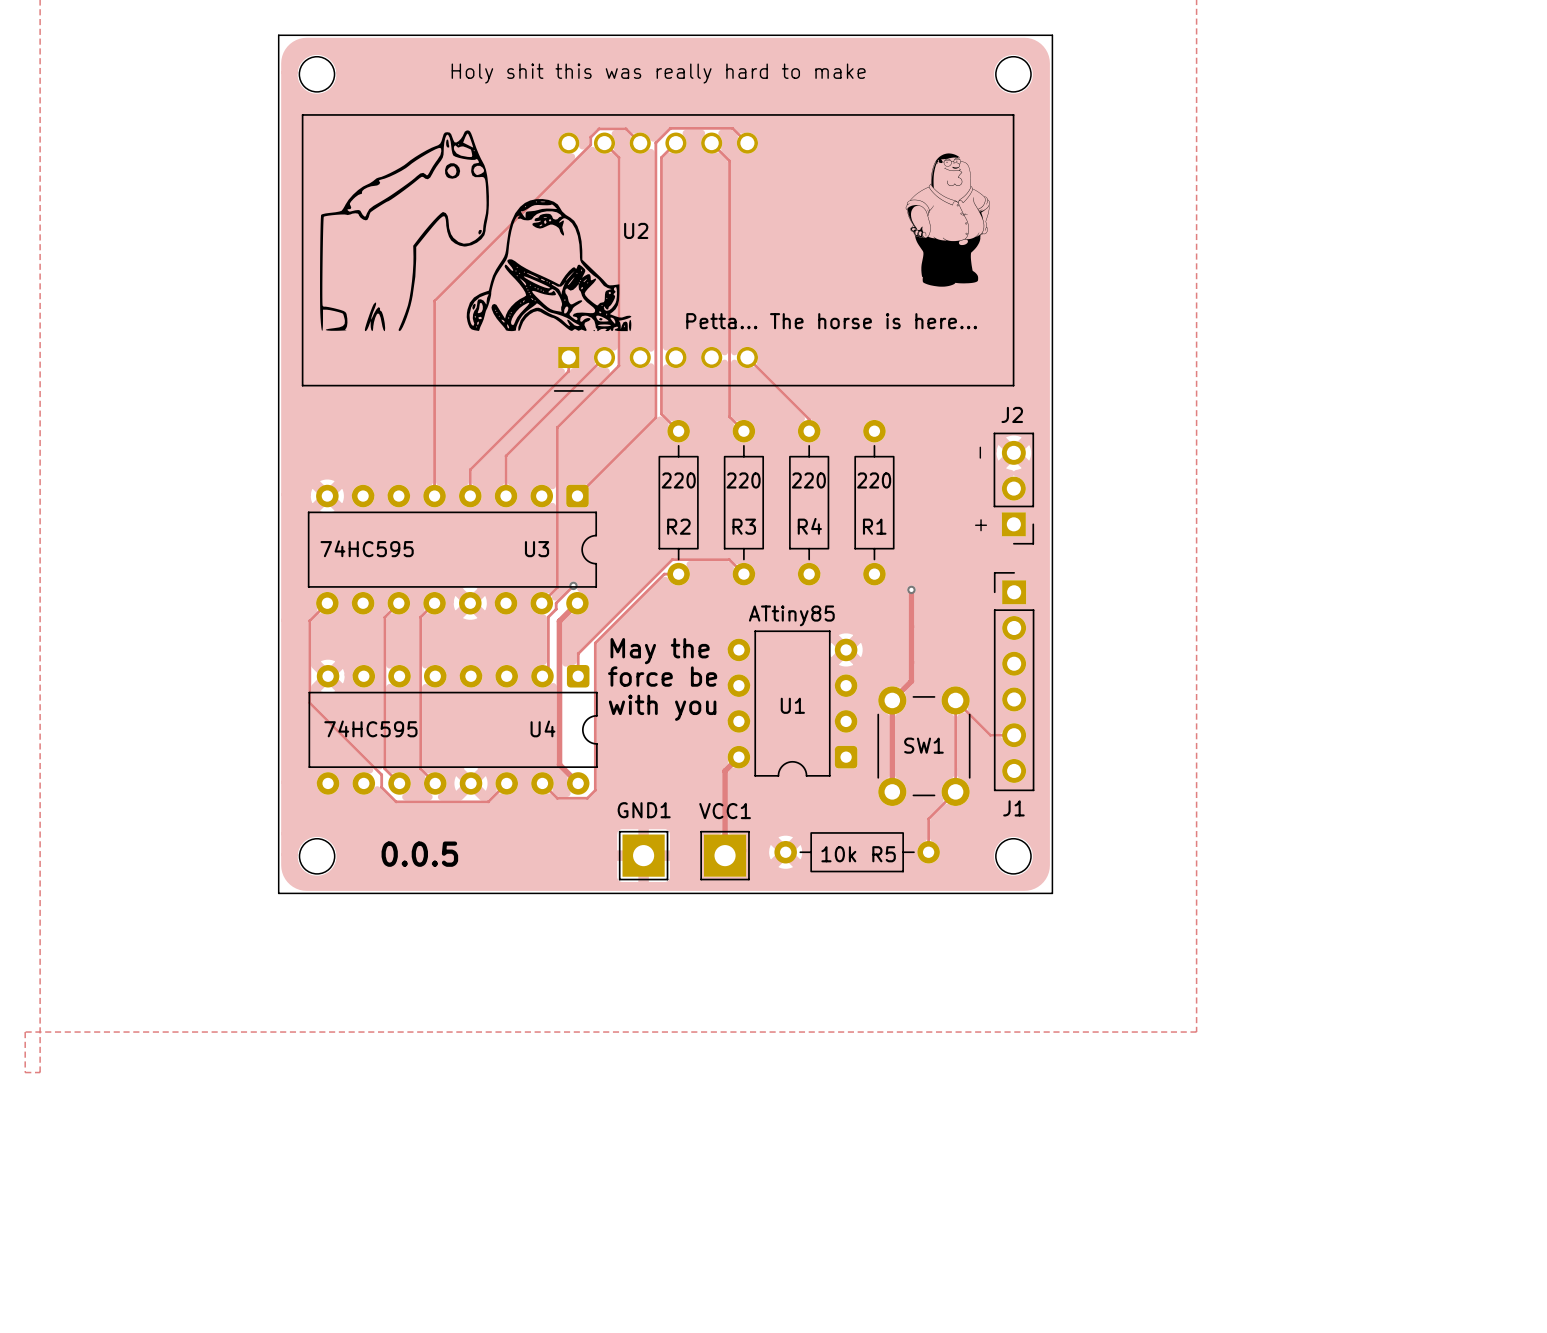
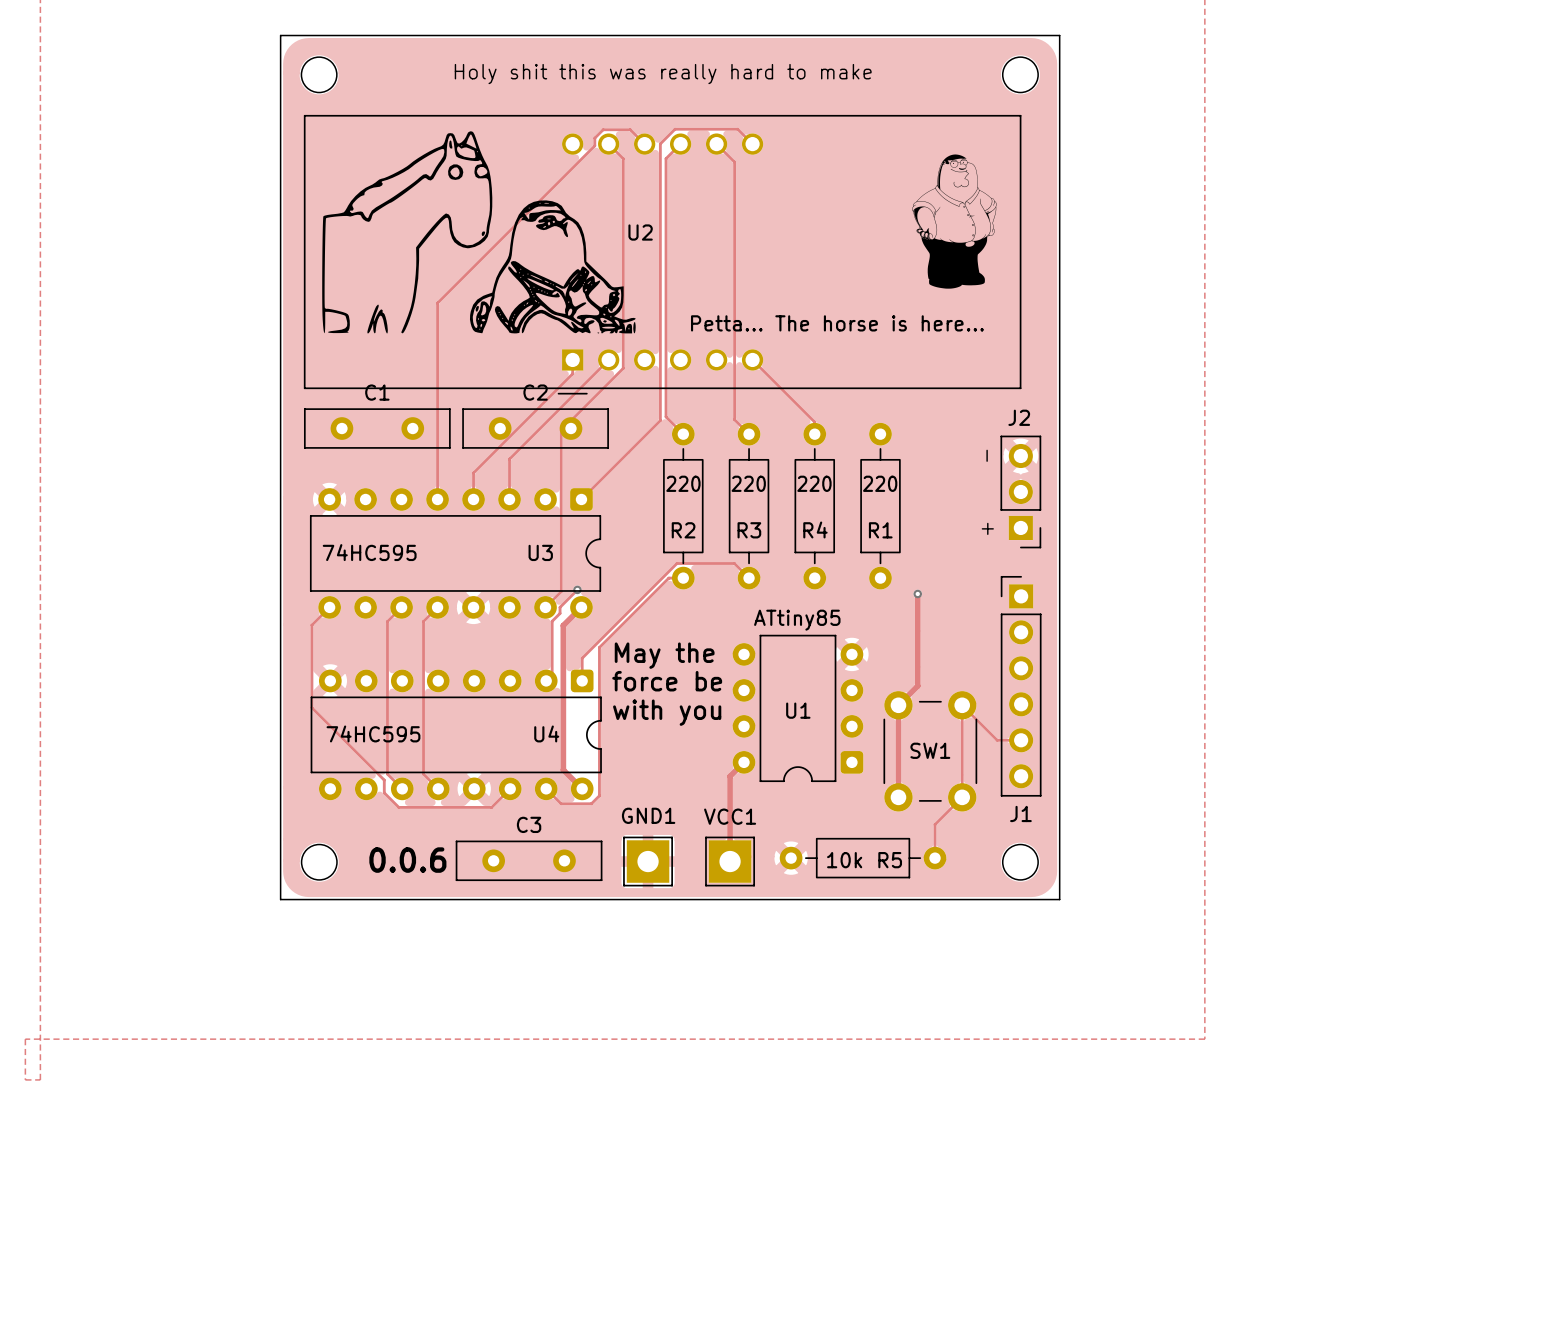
C1: none -> (377, 428)
C2: none -> (535, 428)
text: 0.0.5 (419, 854) -> 0.0.6 (407, 860)
C3: none -> (529, 860)

